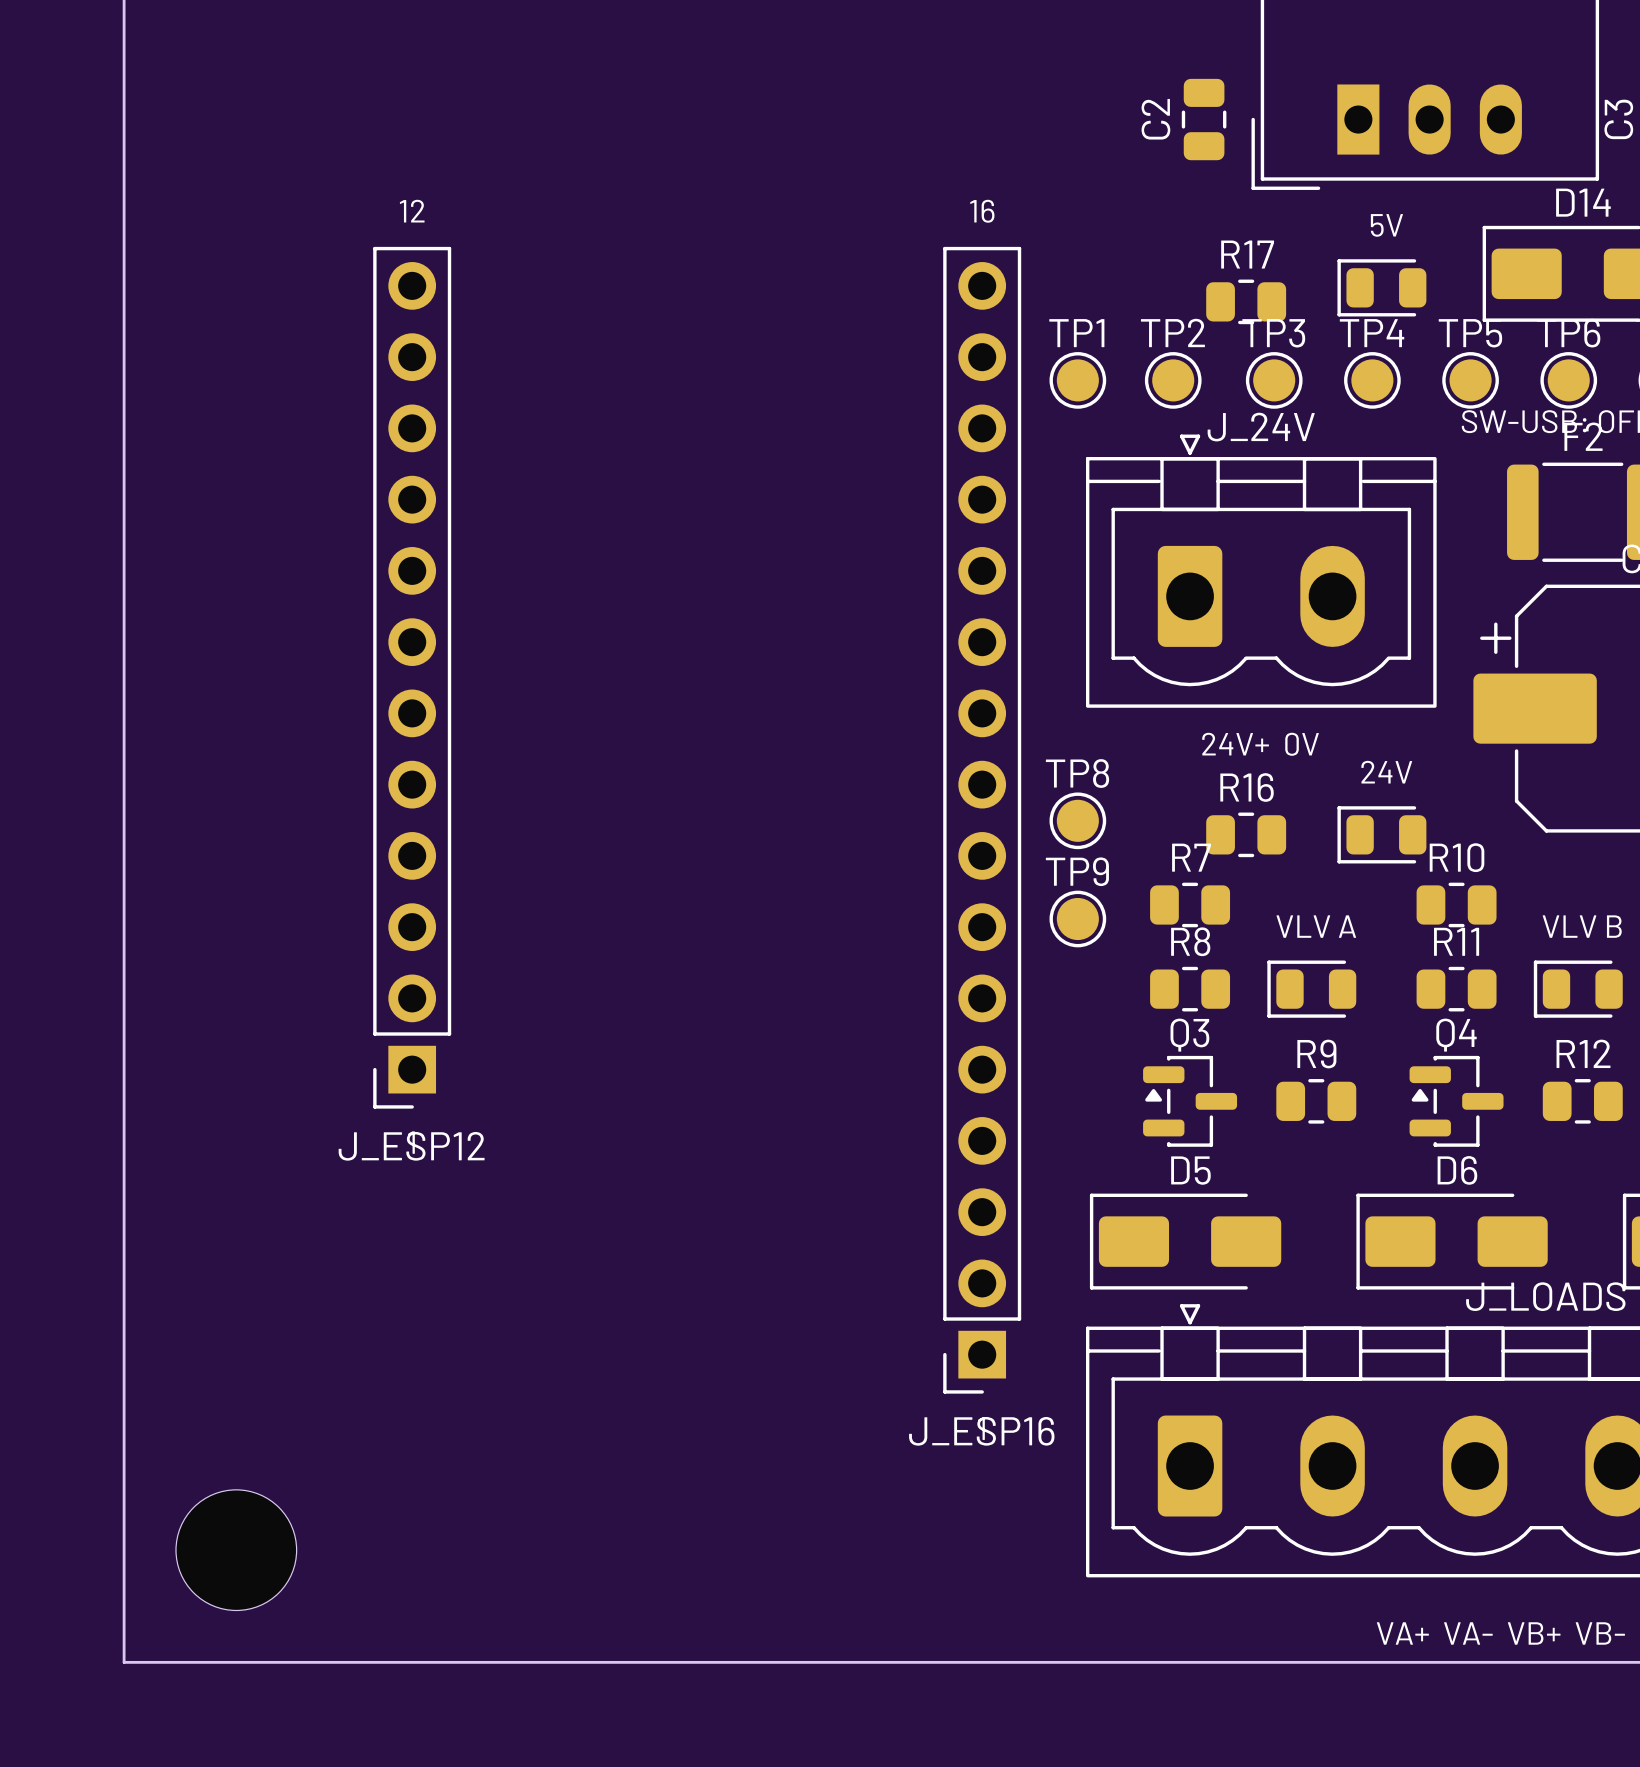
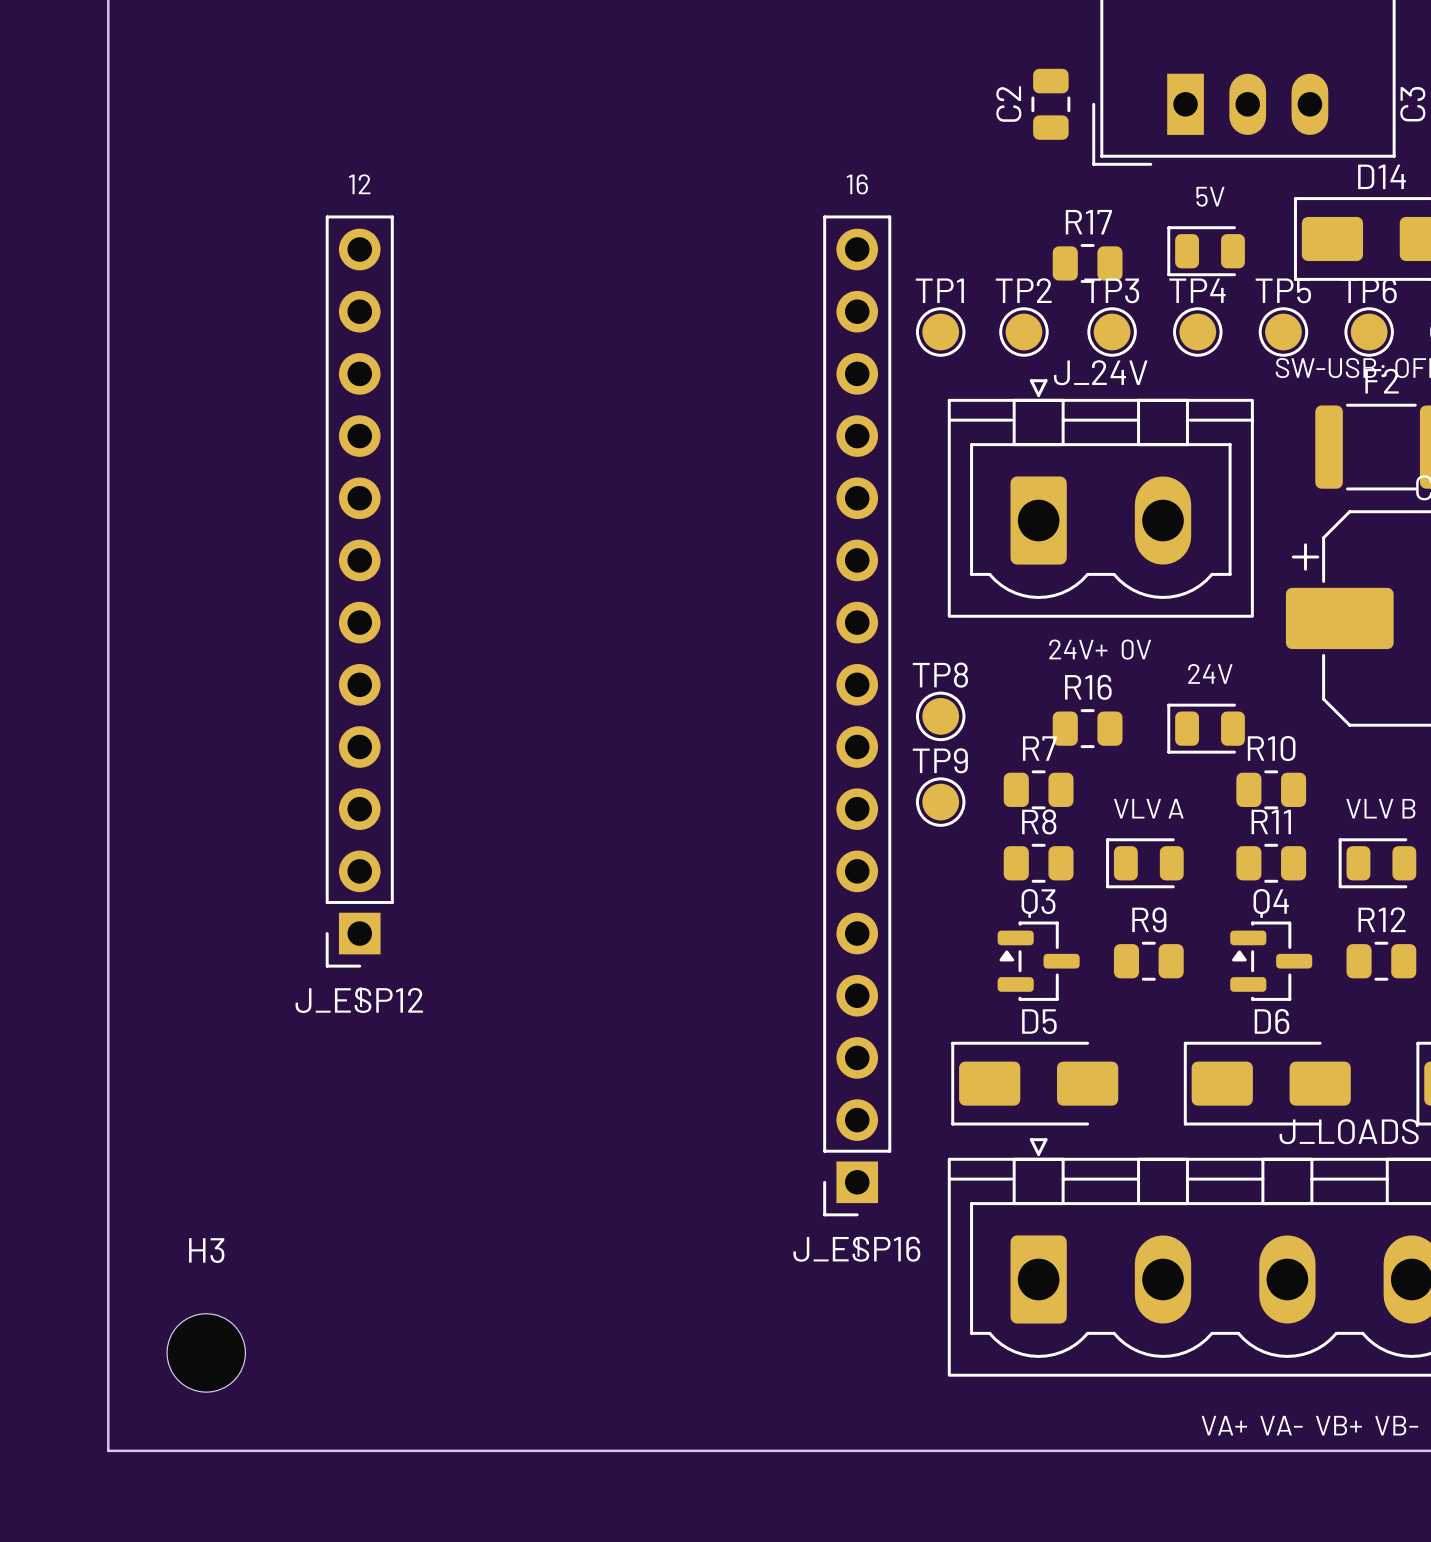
part: (236, 1550) -> none
H3: none -> (206, 1352)

